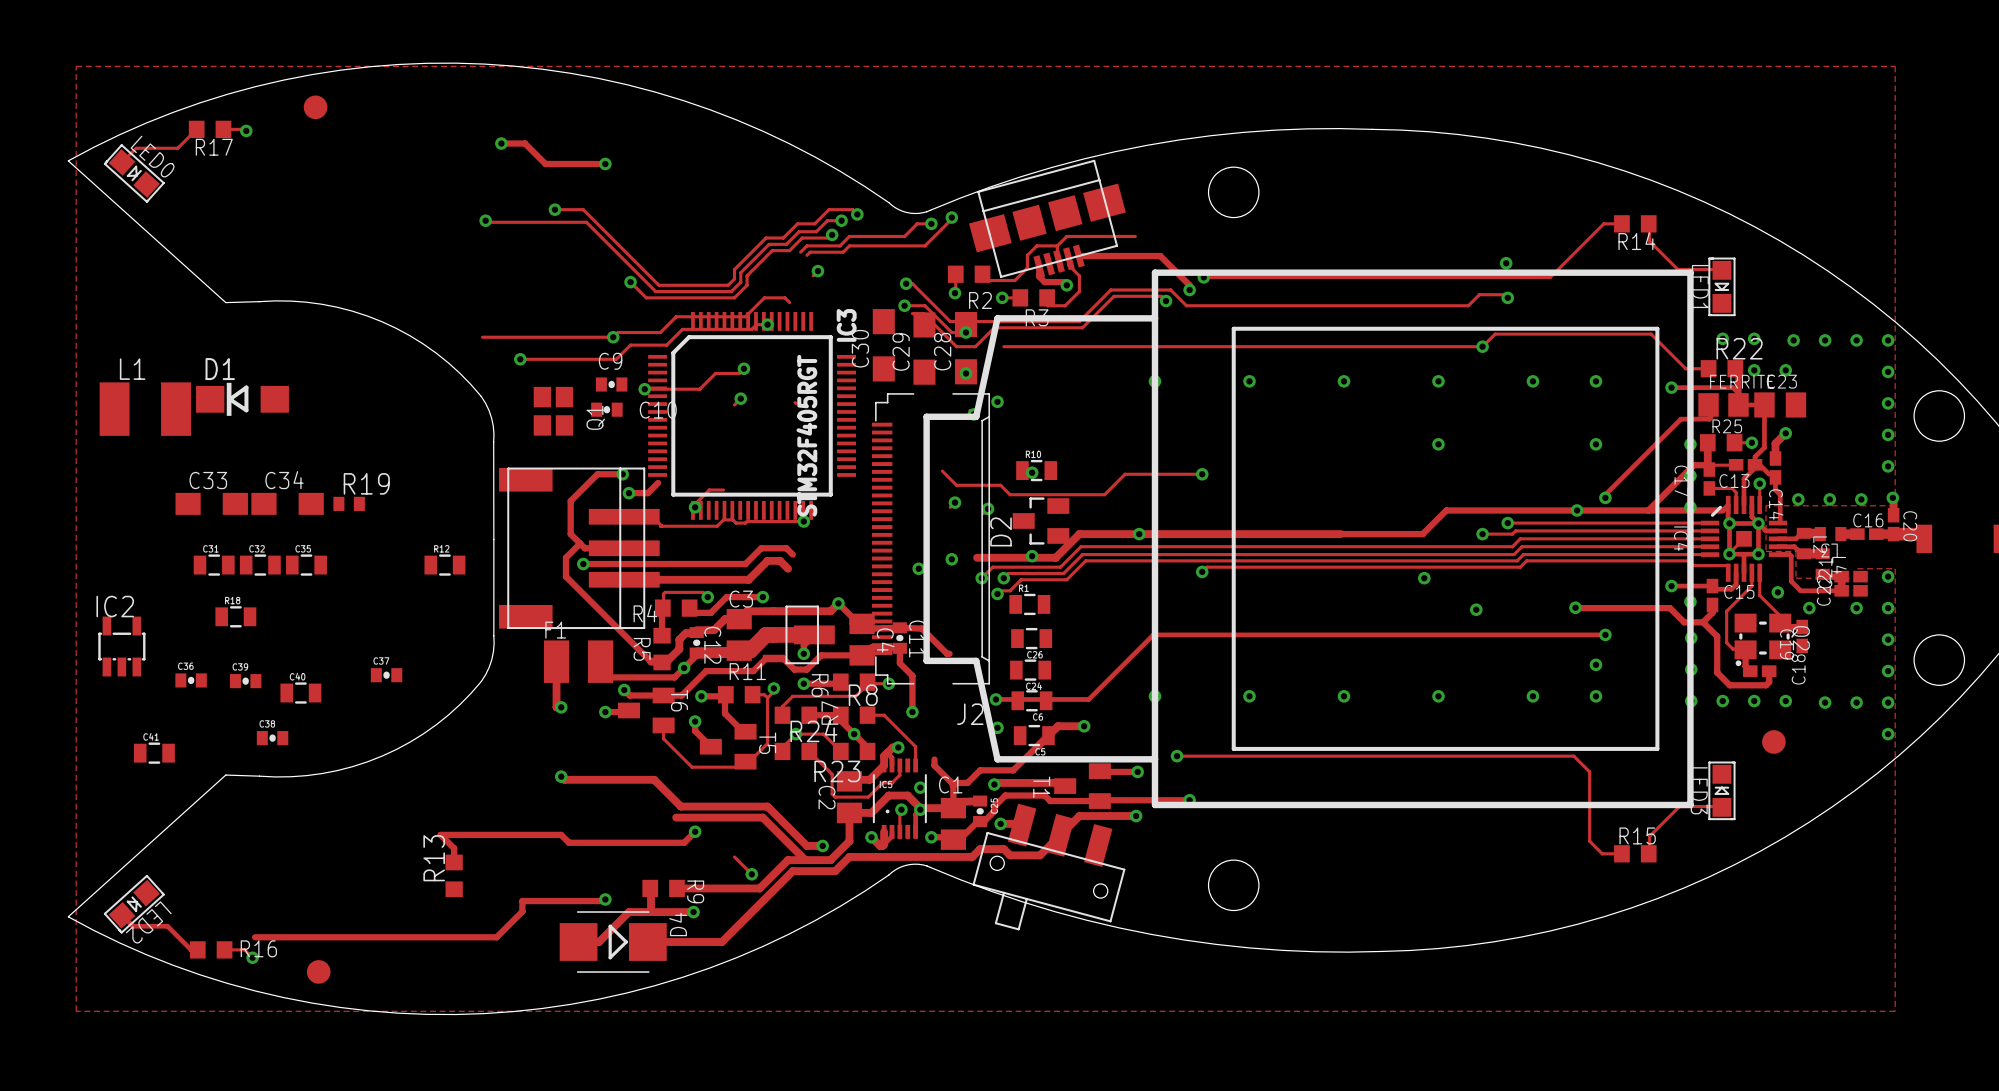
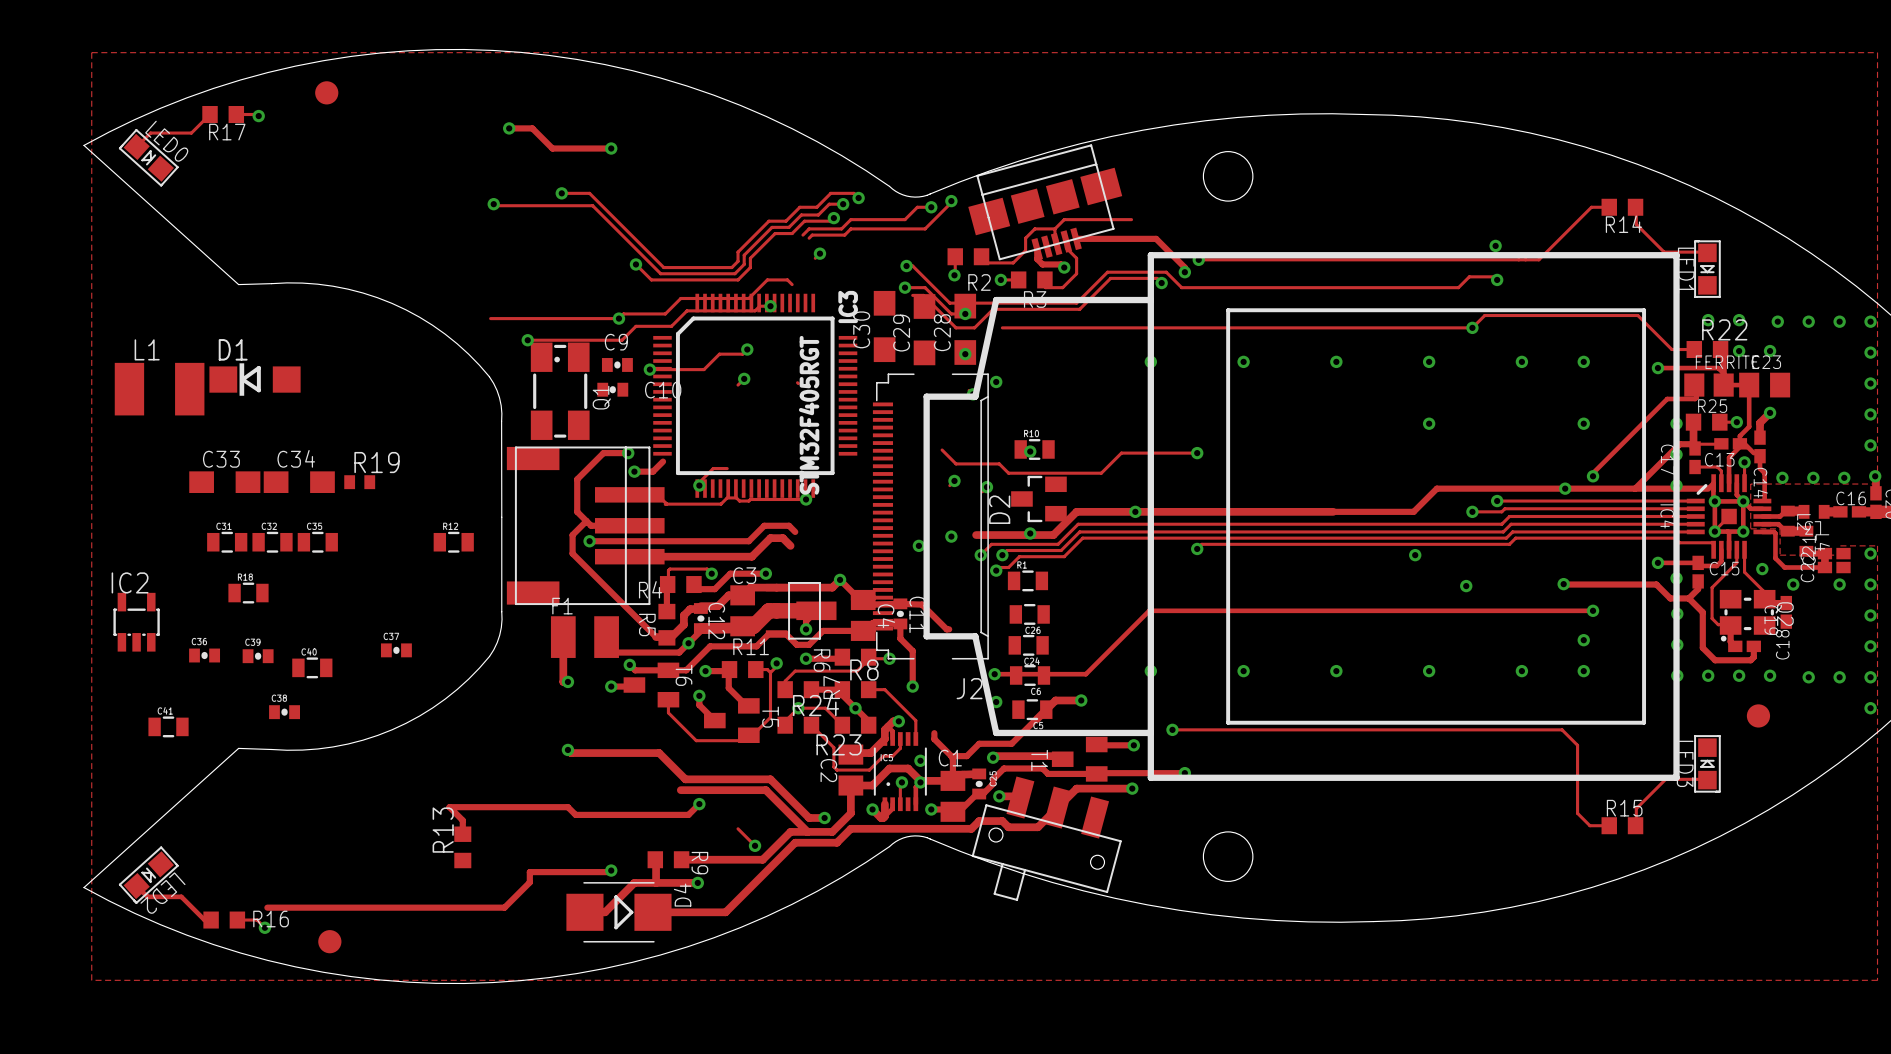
Q1 footprint: [533, 386, 574, 436] -> [530, 342, 590, 440]

